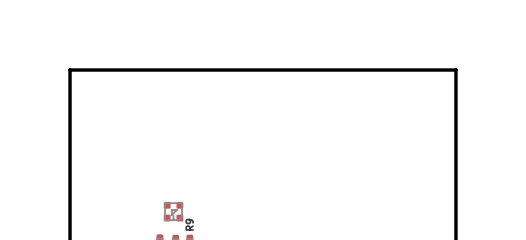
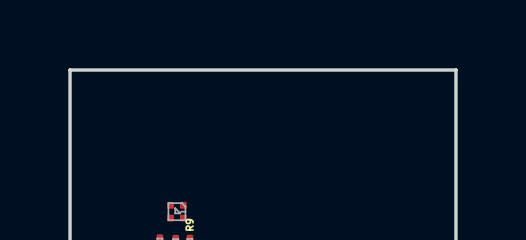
part rotation: 0° (173, 211) -> 90° counterclockwise (176, 211)

